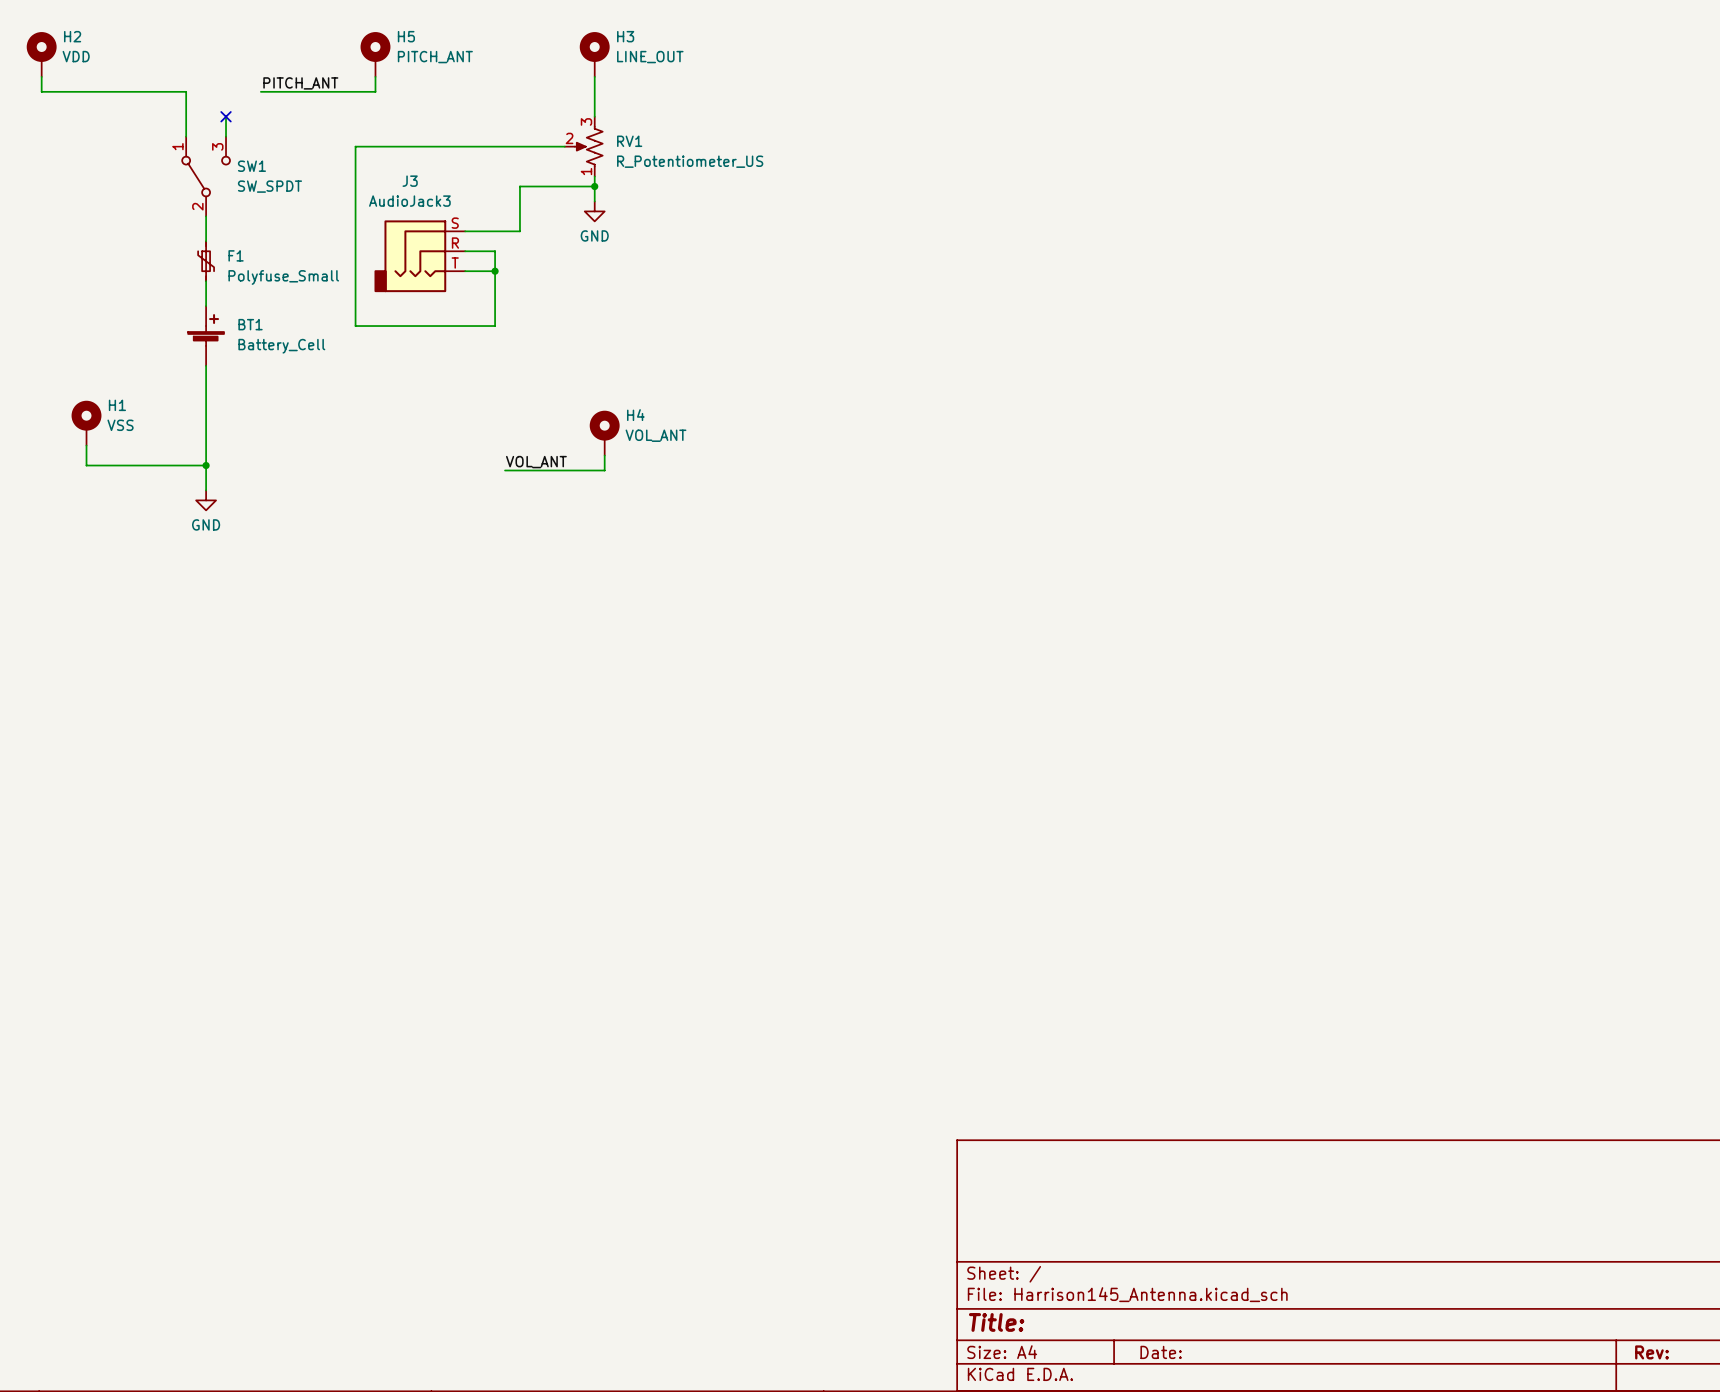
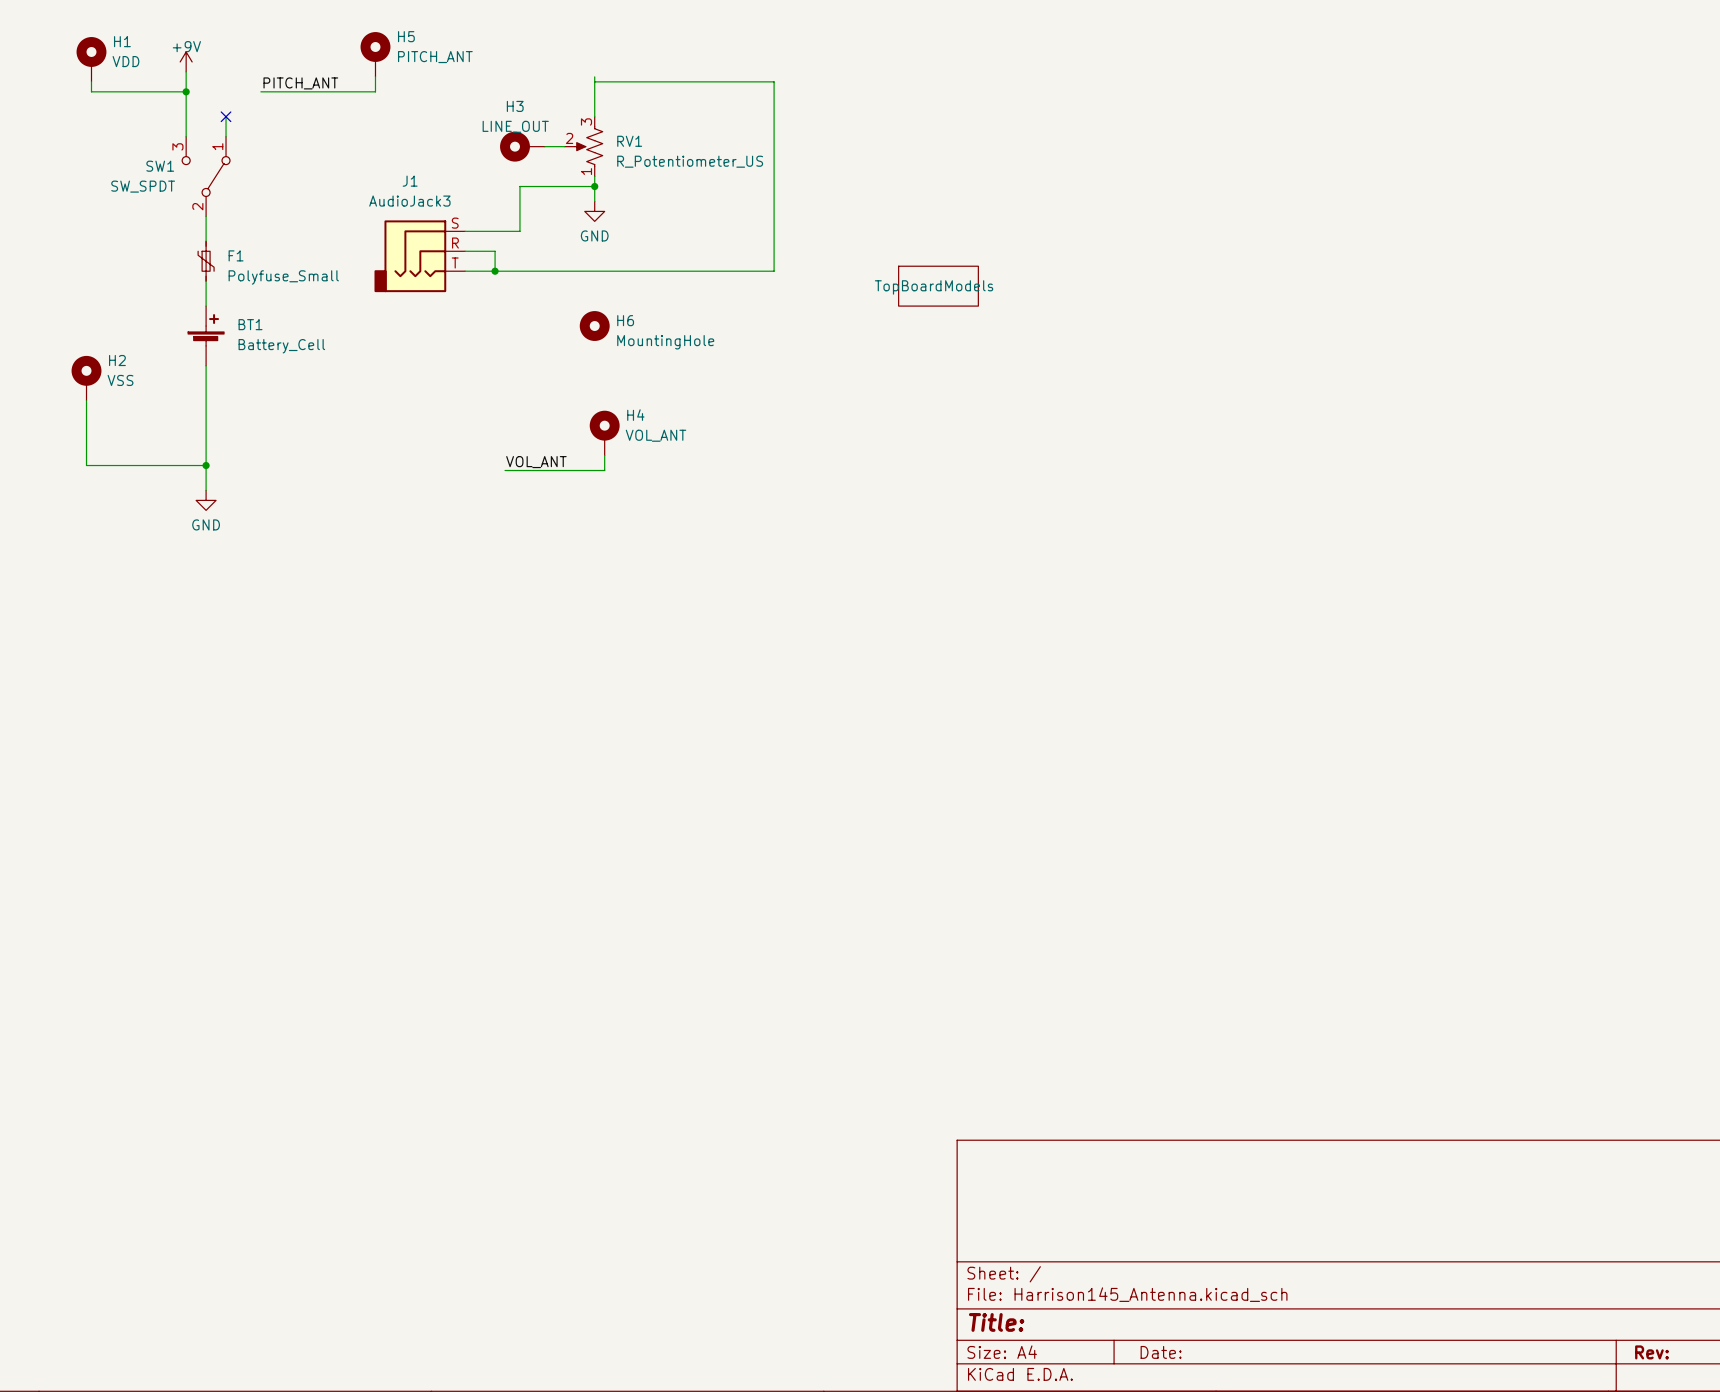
H3 rotation: 0° (594, 47) -> 90° counterclockwise (514, 146)
H2 position: (41, 54) -> (86, 378)
H3 position: (594, 54) -> (522, 146)
H2 value: VDD (76, 56) -> VSS (120, 380)
H3 value position: LINE_OUT (650, 57) -> LINE_OUT (515, 126)
power symbol: none -> +9V (186, 61)
wire: none -> (186, 71) (186, 91)
wire: (41, 76) (41, 91) (91, 91) -> (91, 81) (91, 91)
junction: none -> (186, 91)
wire: (544, 146) (355, 146) (355, 326) (495, 326) (495, 271) -> (594, 81) (774, 81) (774, 271) (495, 271)
SW1 flip: as is (206, 176) -> left-right (206, 176)
J3 name: J3 (410, 181) -> J1 (410, 181)
part: none -> TopBoardModels (938, 286)
H6: none -> MountingHole (594, 326)
H1 position: (86, 423) -> (91, 59)
H1 value: VSS (120, 425) -> VDD (125, 61)

